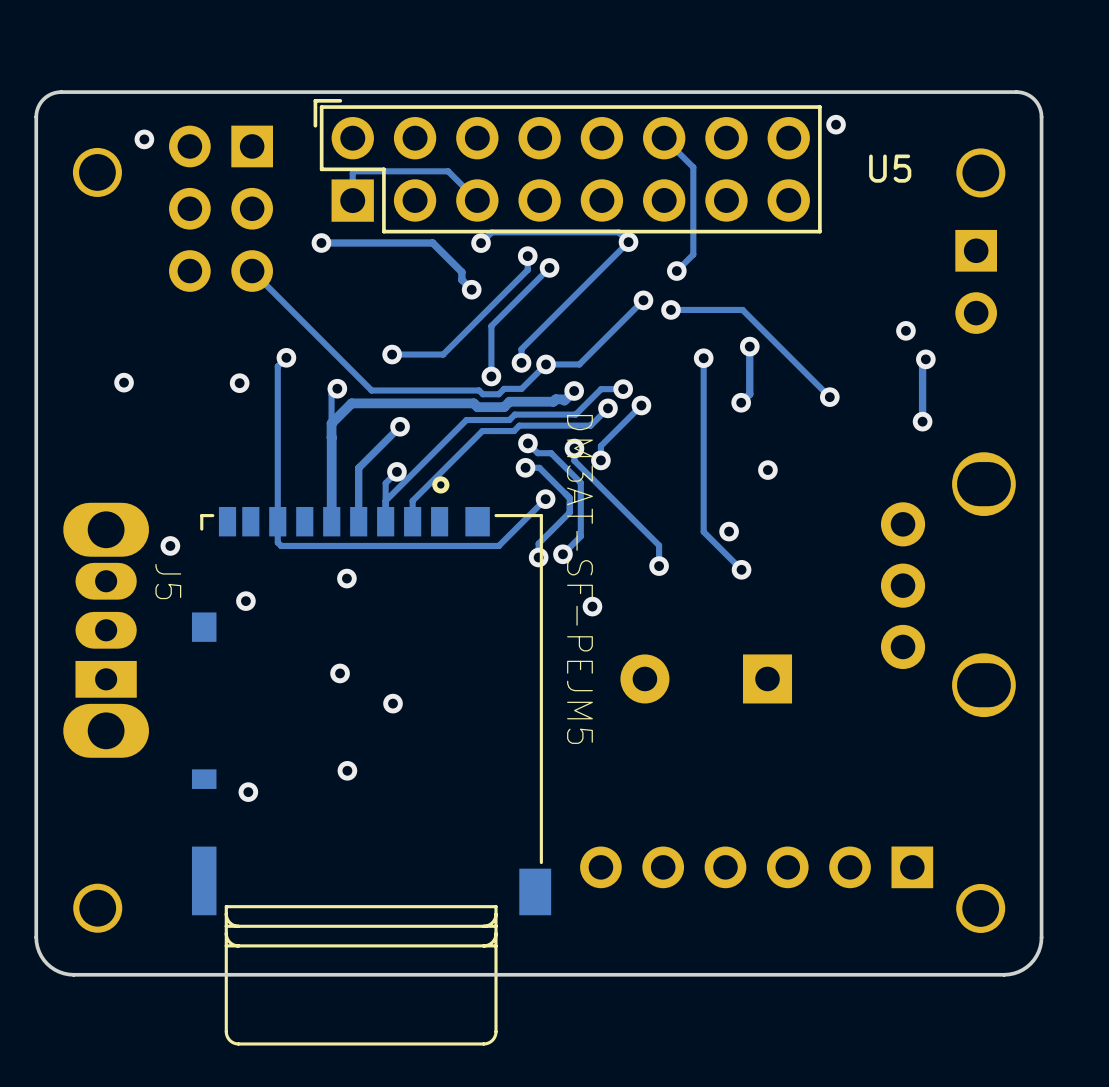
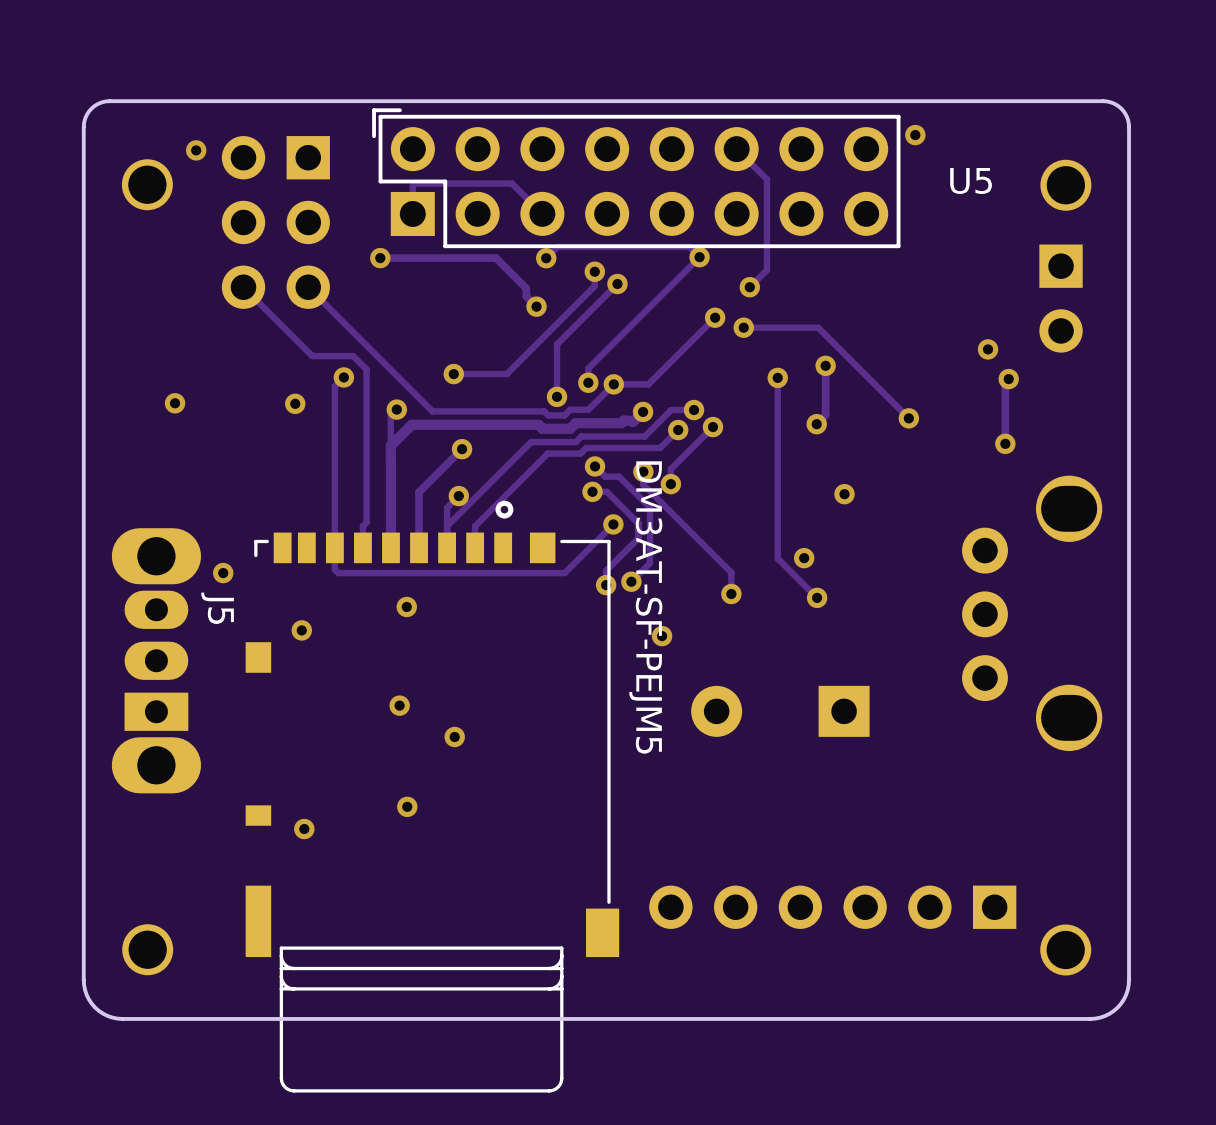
track: none -> (243, 287) (312, 356) (353, 356) (366, 369) (366, 522) (362, 526) (362, 547)

